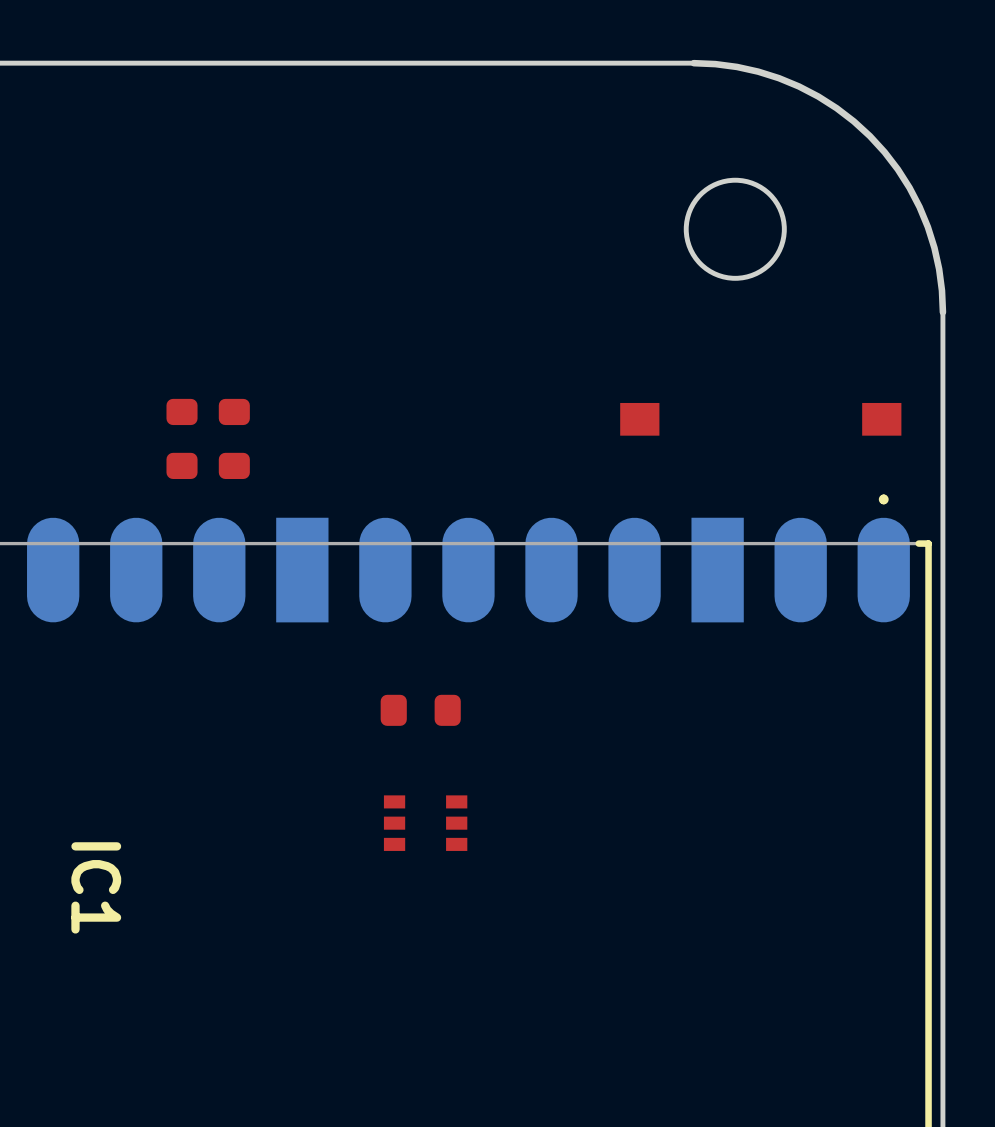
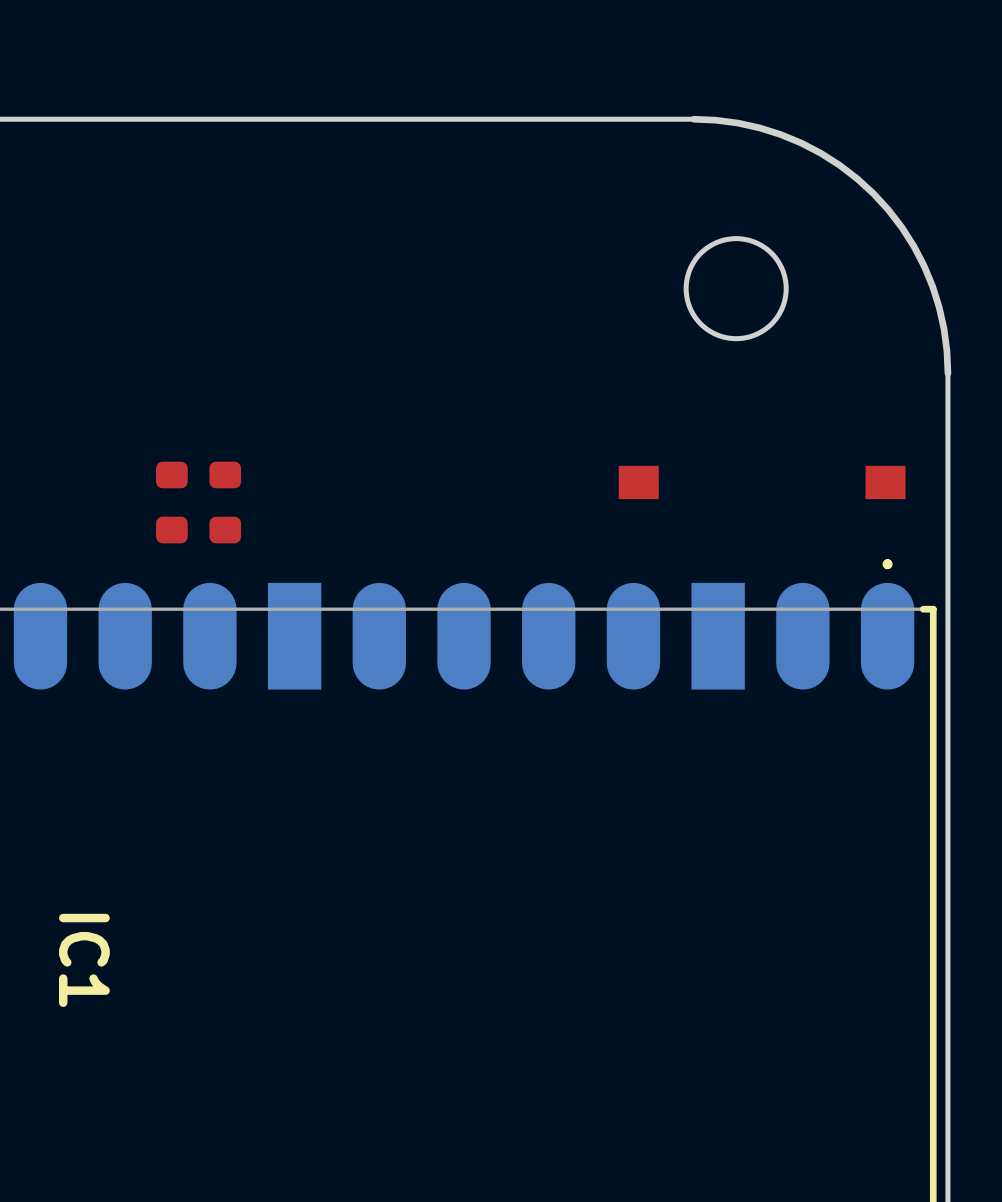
part: (420, 710) -> none
part: (425, 823) -> none

